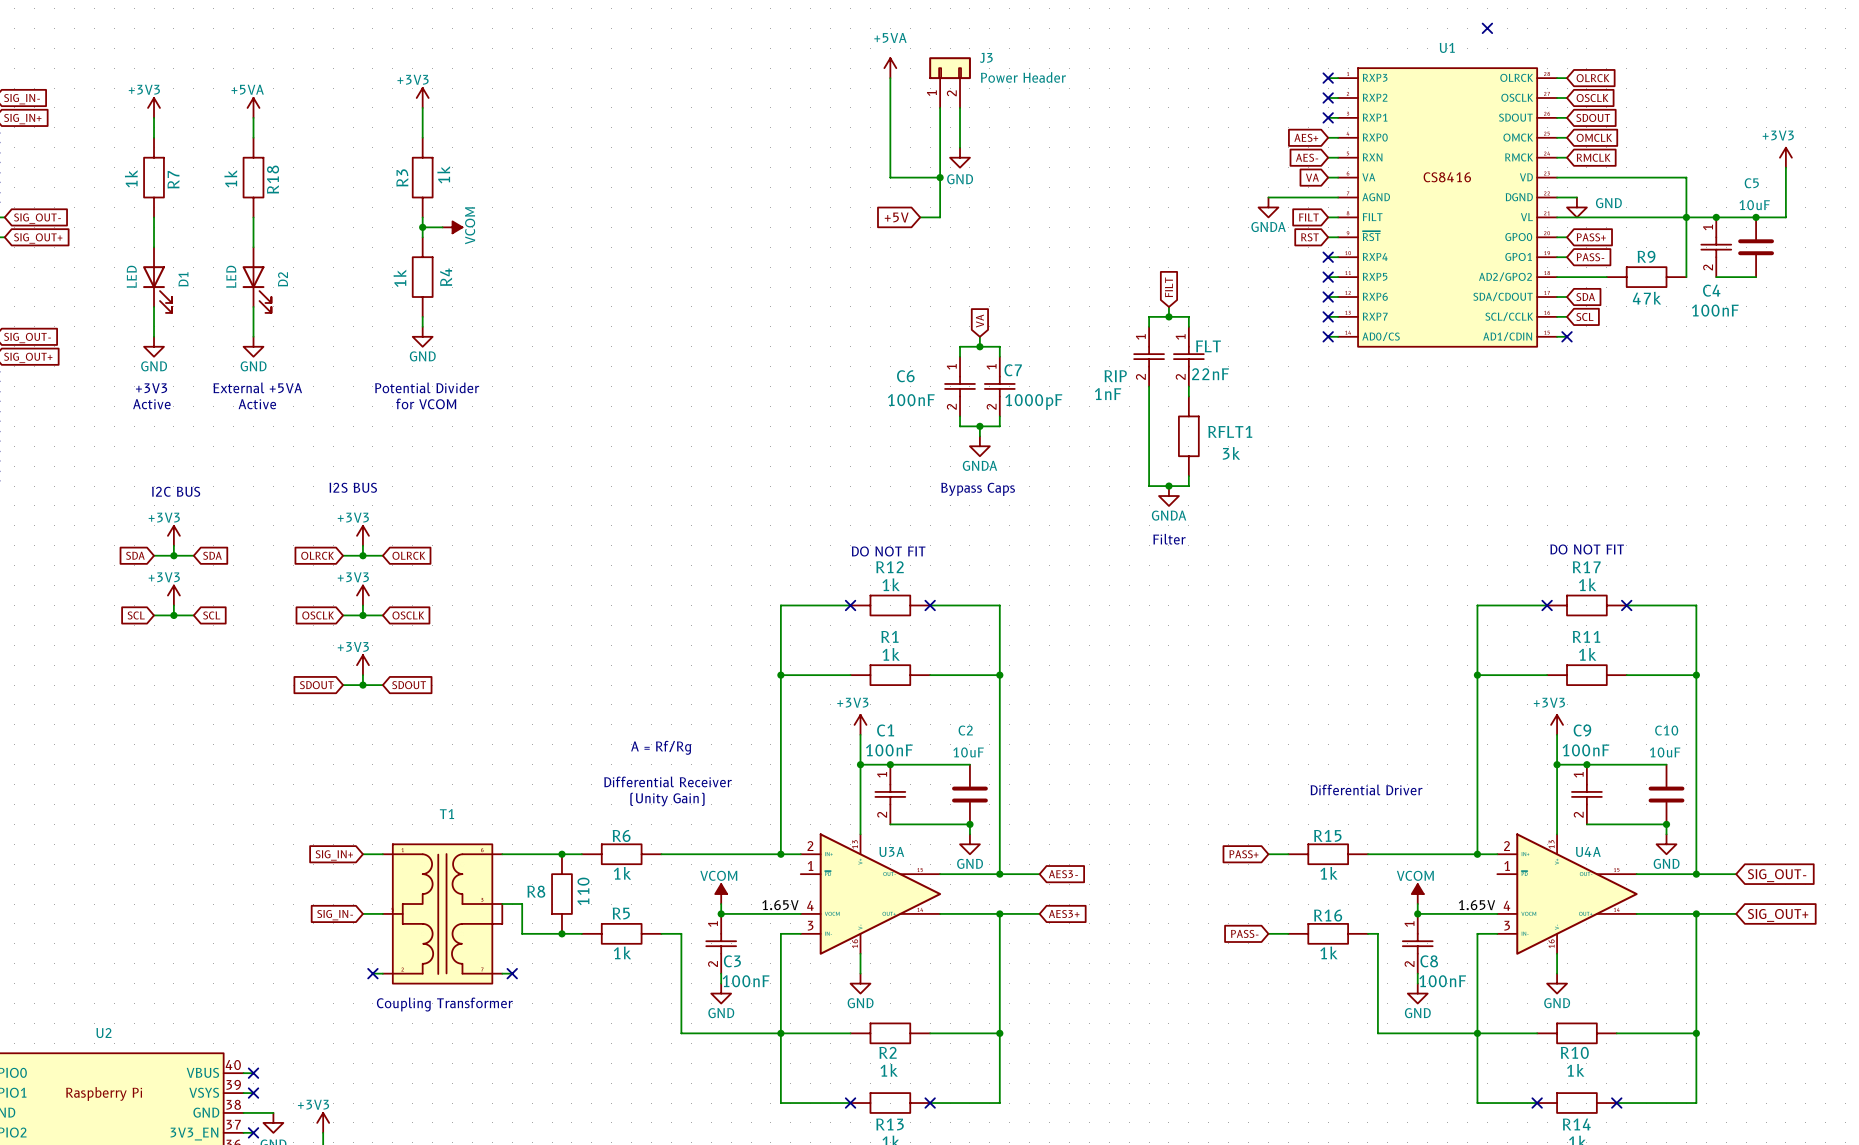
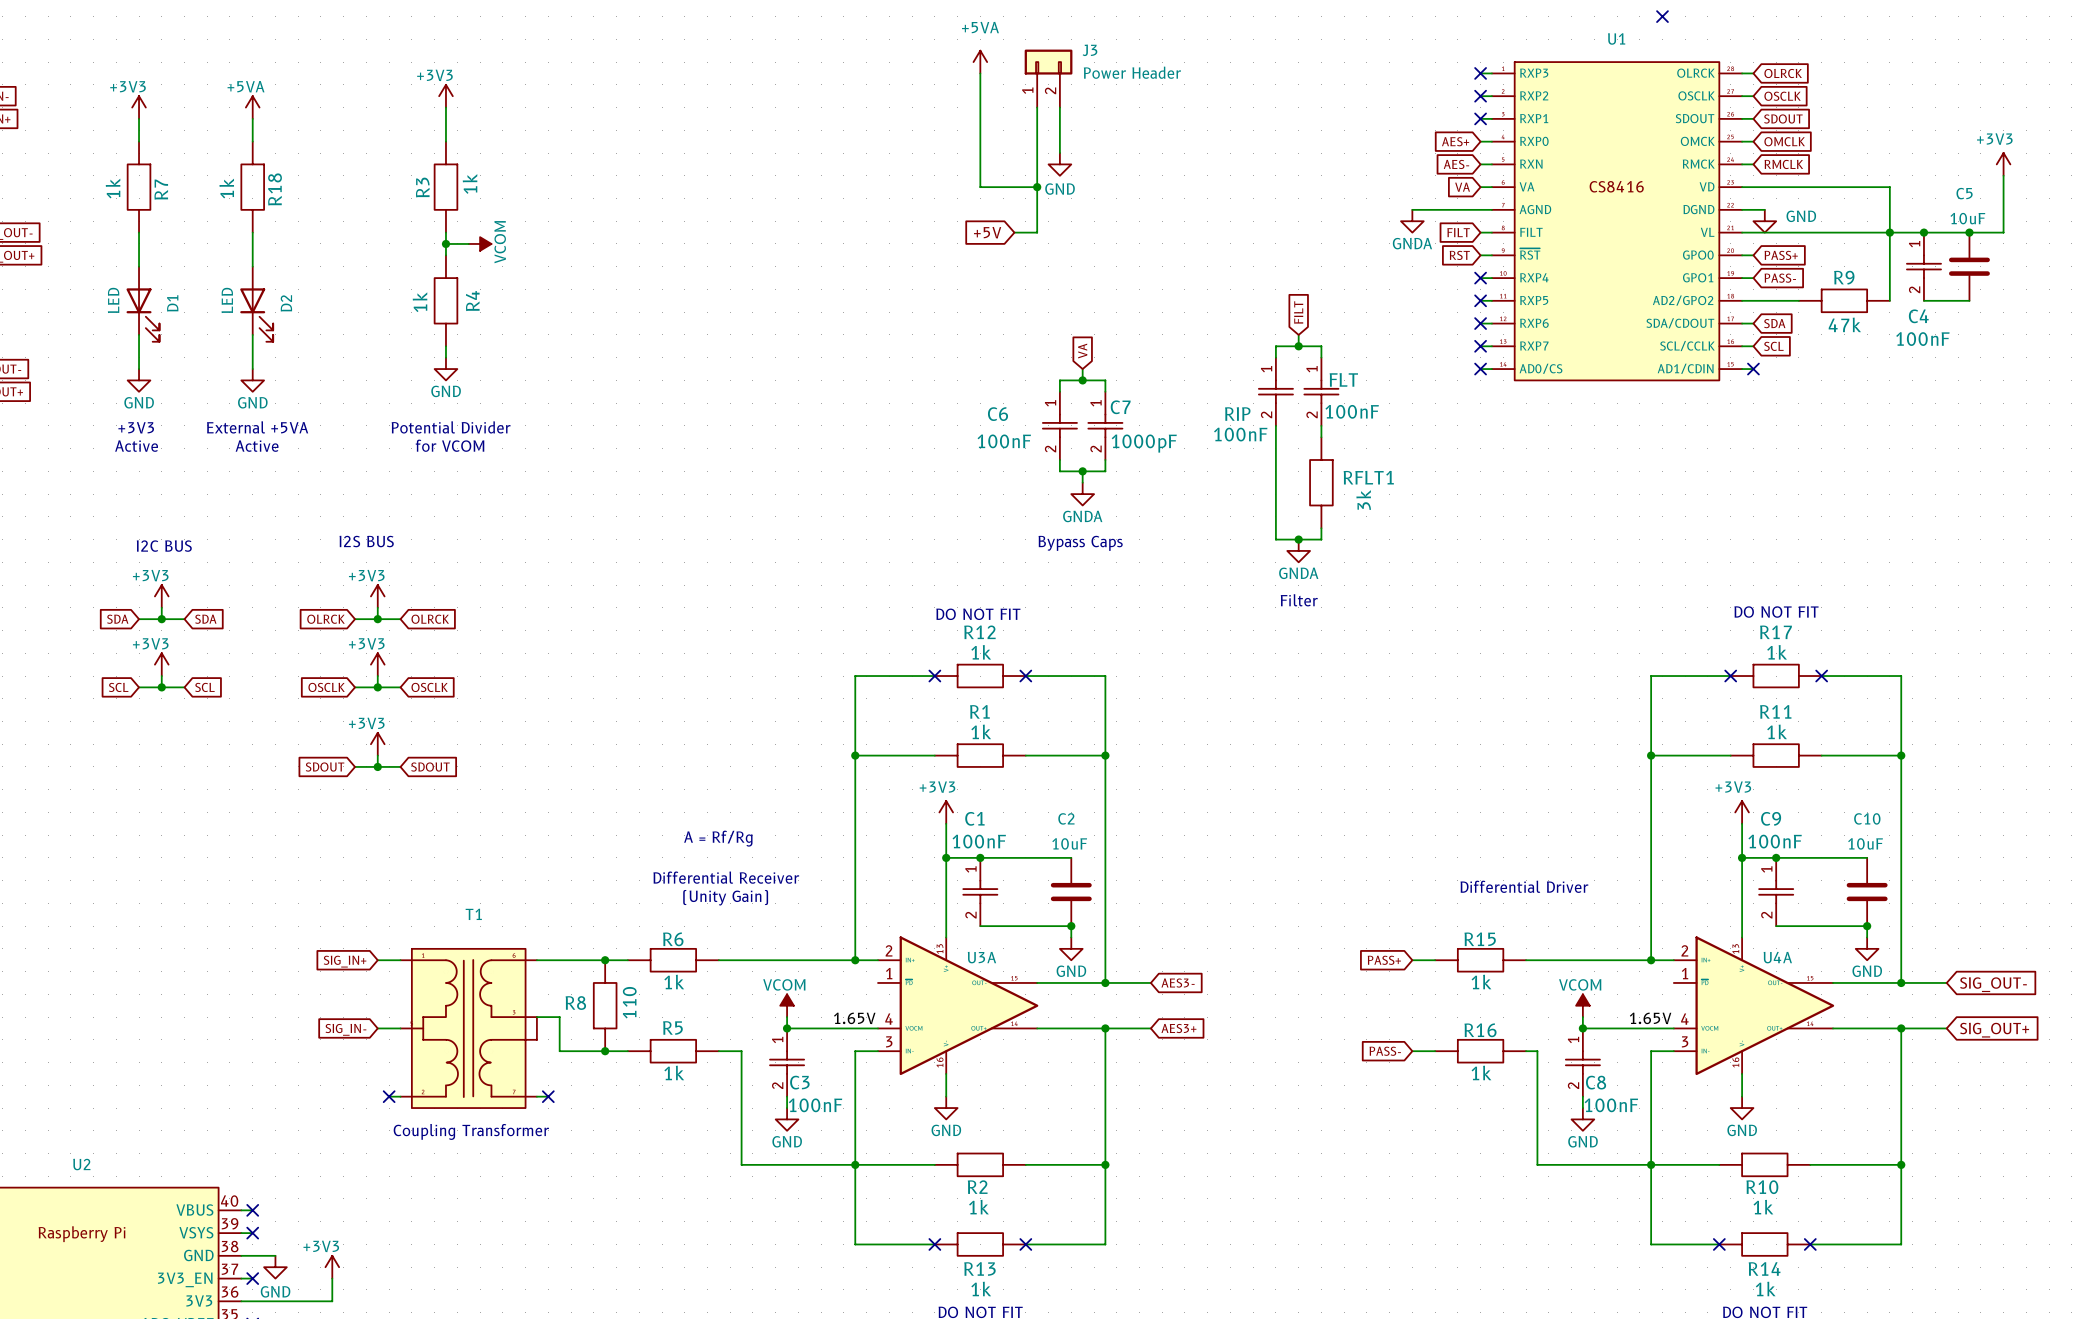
FLT value: 22nF (1210, 374) -> 100nF (1352, 411)
RIP value: 1nF (1108, 394) -> 100nF (1240, 434)
RFLT1 value rotation: 0° (1231, 453) -> 90° counterclockwise (1363, 500)

